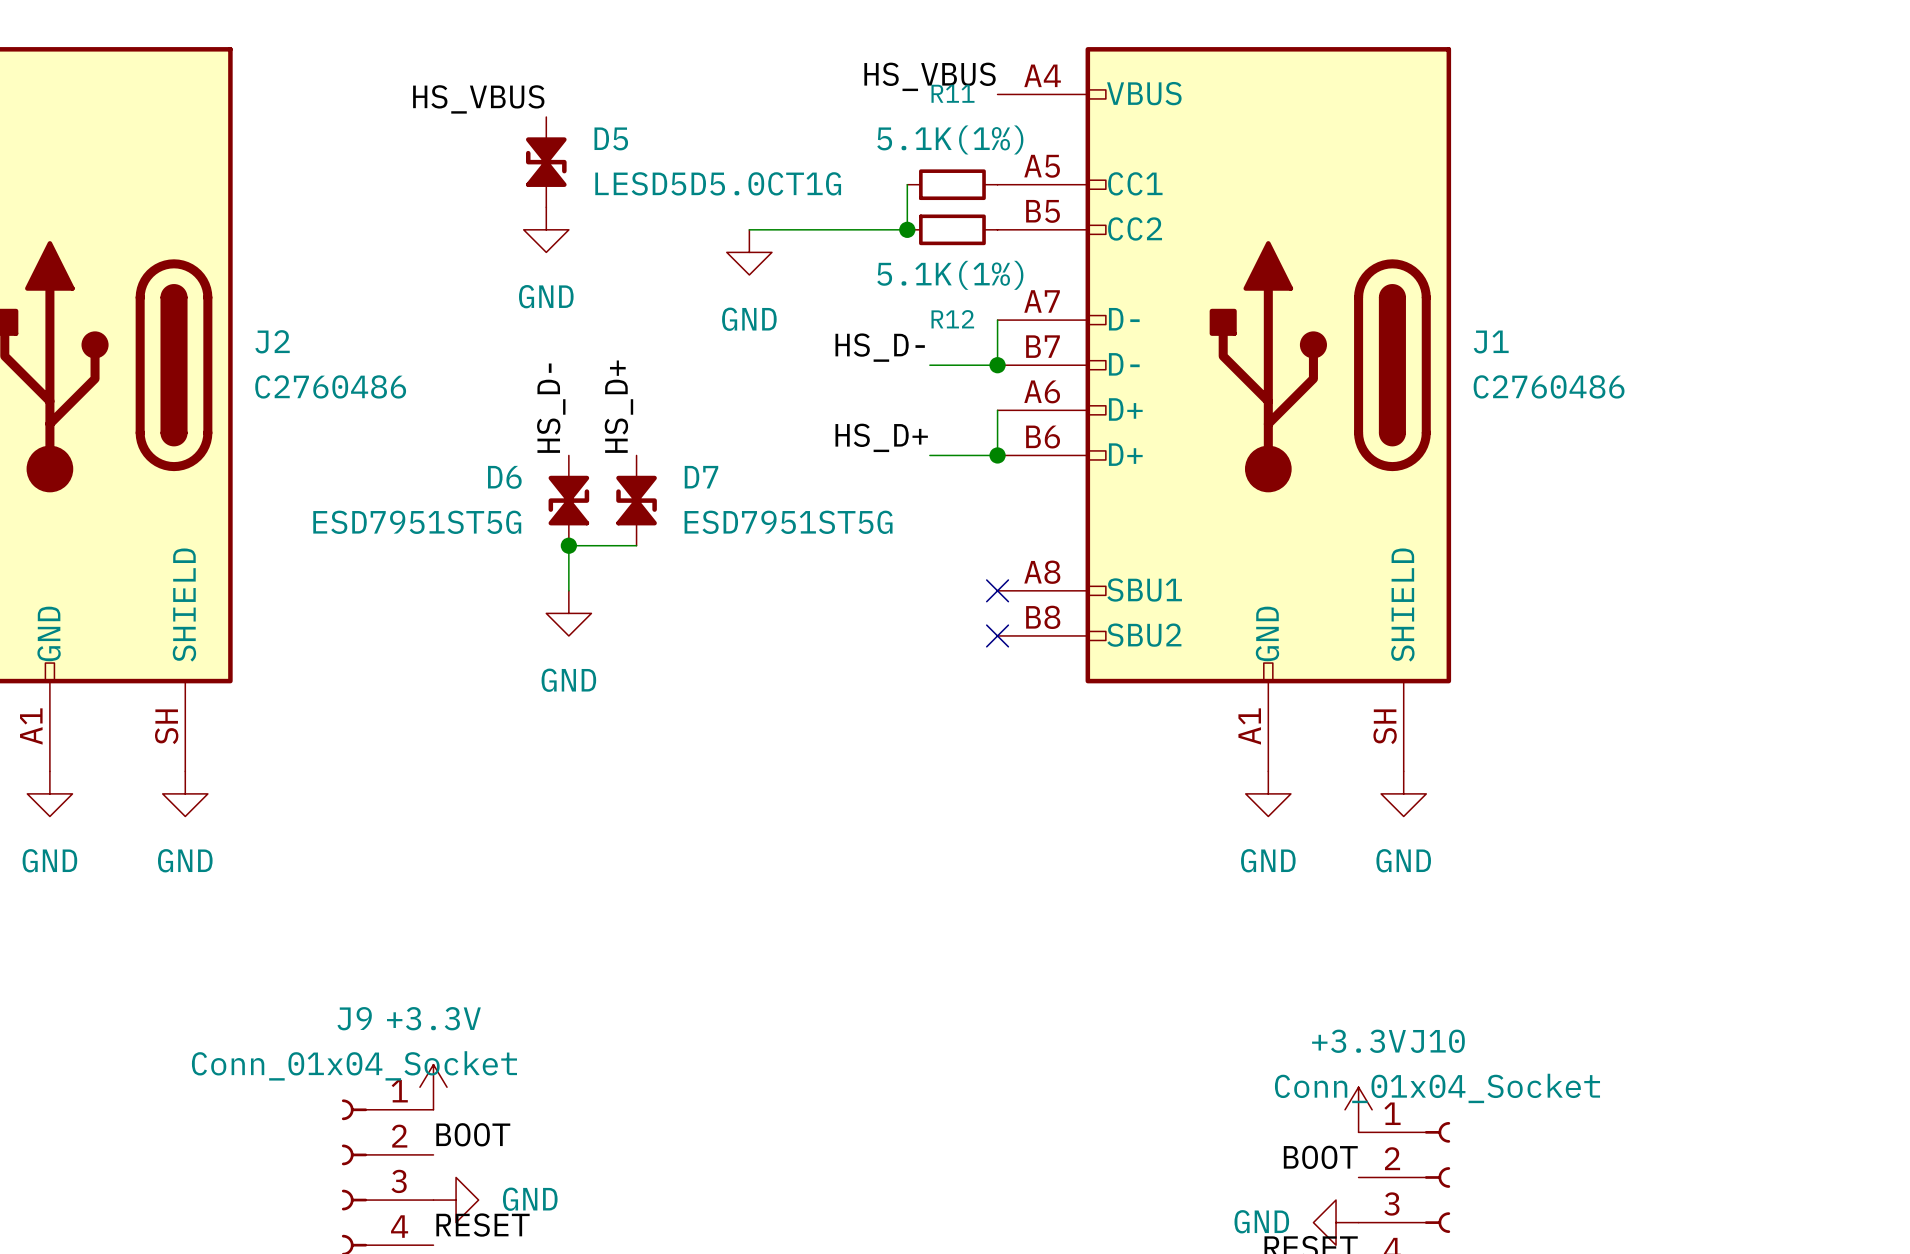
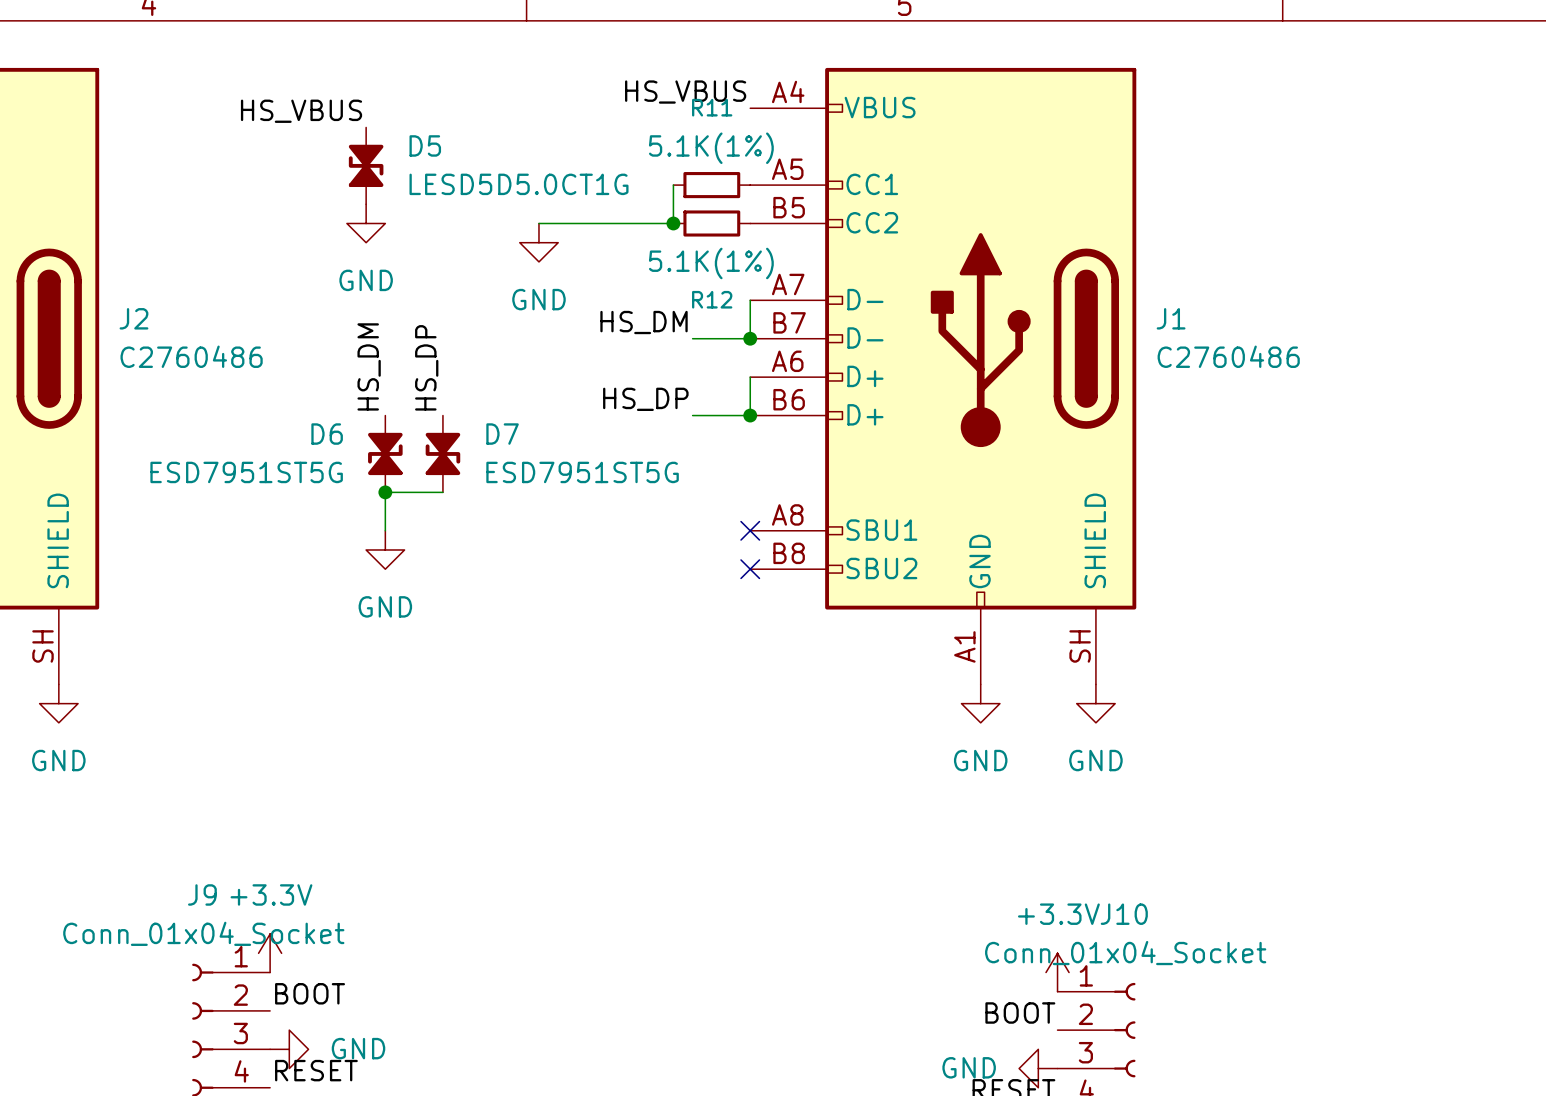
label: HS_D- (880, 347) -> HS_DM (644, 322)
label: HS_D+ (618, 406) -> HS_DP (426, 367)
label: HS_D- (551, 408) -> HS_DM (369, 366)
label: HS_D+ (881, 437) -> HS_DP (645, 399)

